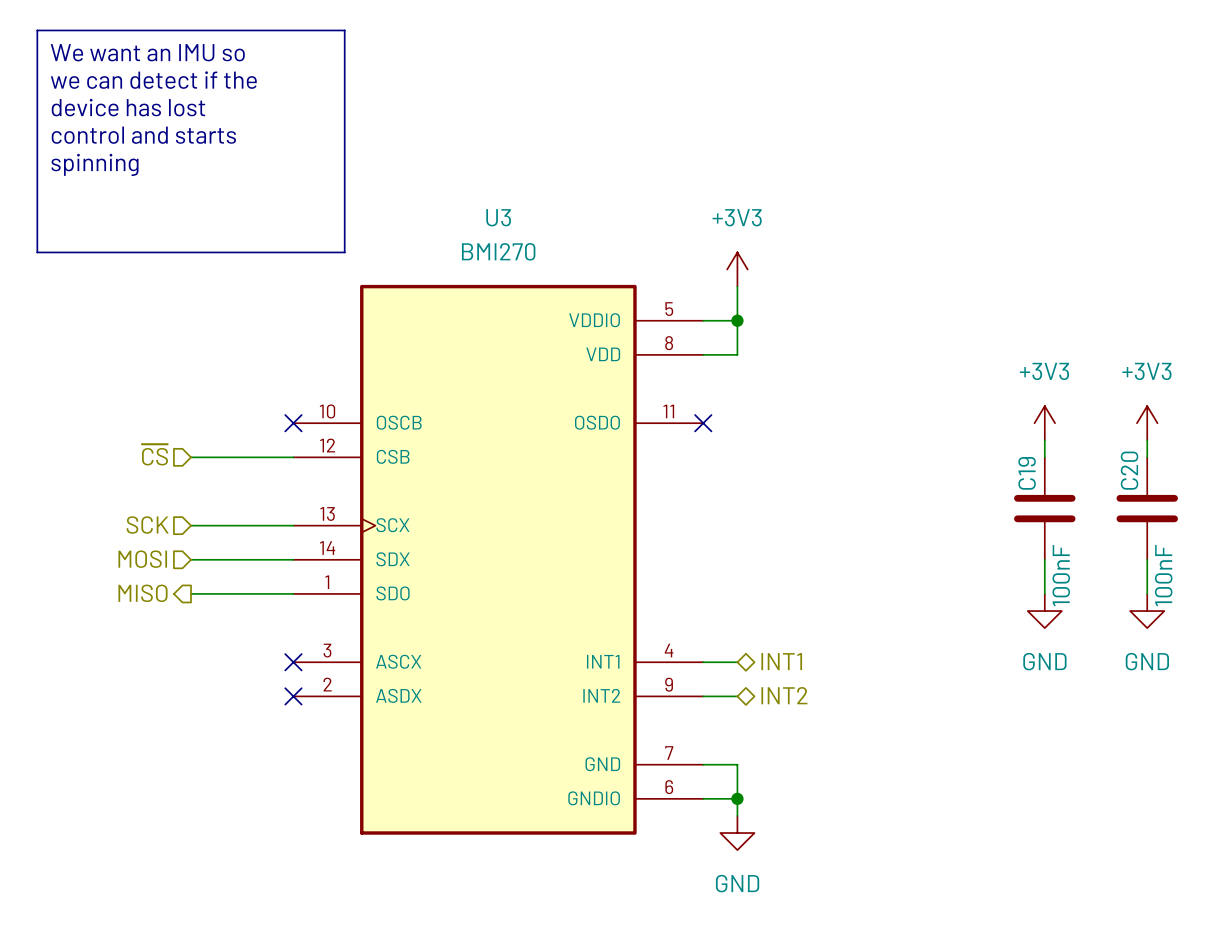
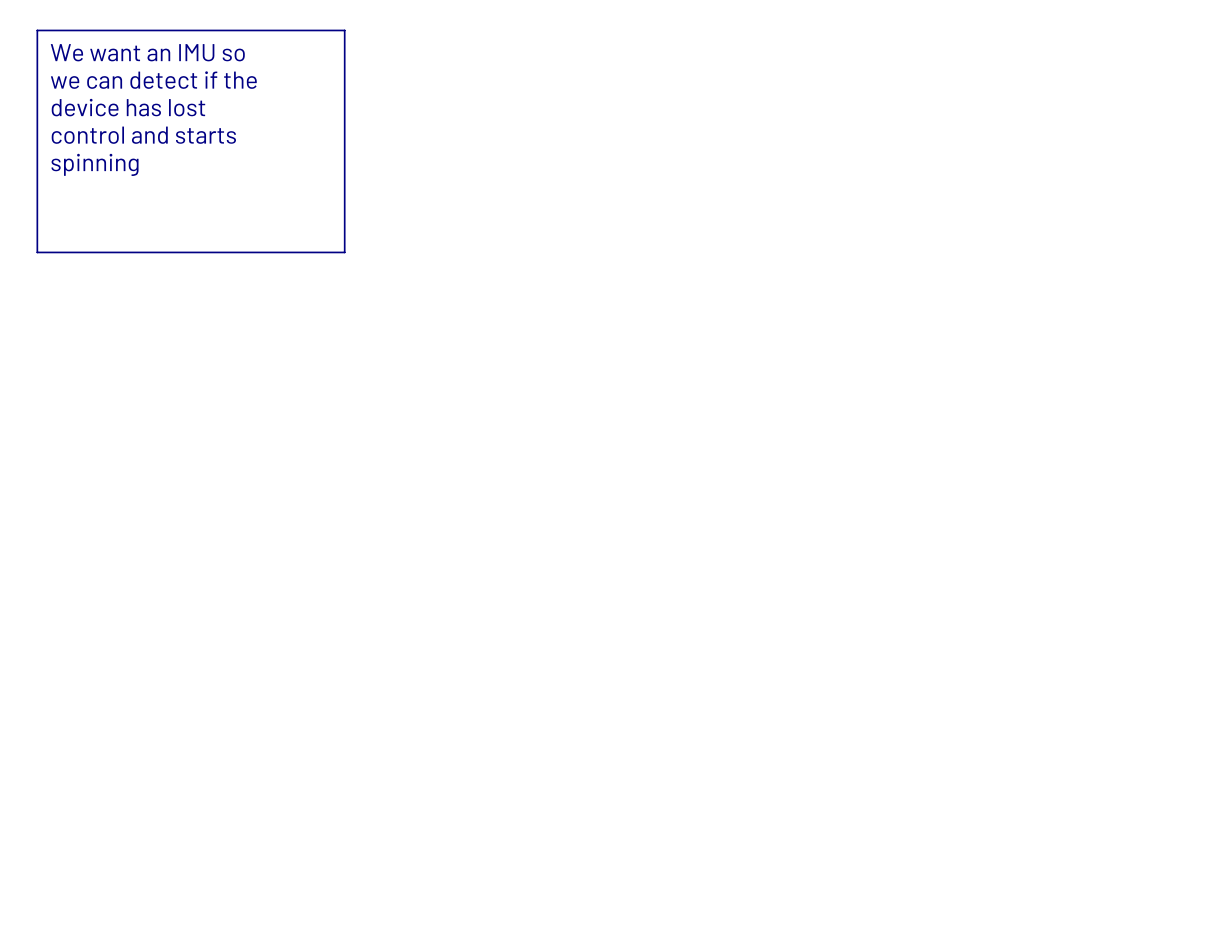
power symbol: +3V3 (737, 269) -> none
wire: (737, 286) (737, 354) (703, 354) -> none
wire: (703, 320) (737, 320) -> none
junction: (737, 320) -> none
no-connect mark: (293, 423) -> none
no-connect mark: (703, 423) -> none
power symbol: +3V3 (1044, 423) -> none
power symbol: +3V3 (1147, 423) -> none
wire: (1044, 440) (1044, 457) -> none
wire: (1147, 440) (1147, 457) -> none
hierarchical label: ~{CS} (155, 454) -> none
wire: (191, 457) (293, 457) -> none
C19: 100nF (1044, 508) -> none
C20: 100nF (1147, 508) -> none
hierarchical label: SCK (147, 525) -> none
wire: (191, 525) (293, 525) -> none
hierarchical label: MOSI (142, 559) -> none
wire: (191, 559) (293, 559) -> none
U3: BMI270 (498, 559) -> none
wire: (1044, 559) (1044, 593) -> none
wire: (1147, 559) (1147, 593) -> none
hierarchical label: MISO (143, 593) -> none
wire: (191, 593) (293, 593) -> none
power symbol: GND (1044, 611) -> none
power symbol: GND (1147, 611) -> none
hierarchical label: INT1 (781, 661) -> none
no-connect mark: (293, 662) -> none
wire: (703, 662) (737, 662) -> none
hierarchical label: INT2 (784, 695) -> none
no-connect mark: (293, 696) -> none
wire: (703, 696) (737, 696) -> none
wire: (703, 764) (737, 764) (737, 815) -> none
wire: (703, 798) (737, 798) -> none
junction: (737, 798) -> none
power symbol: GND (737, 833) -> none

